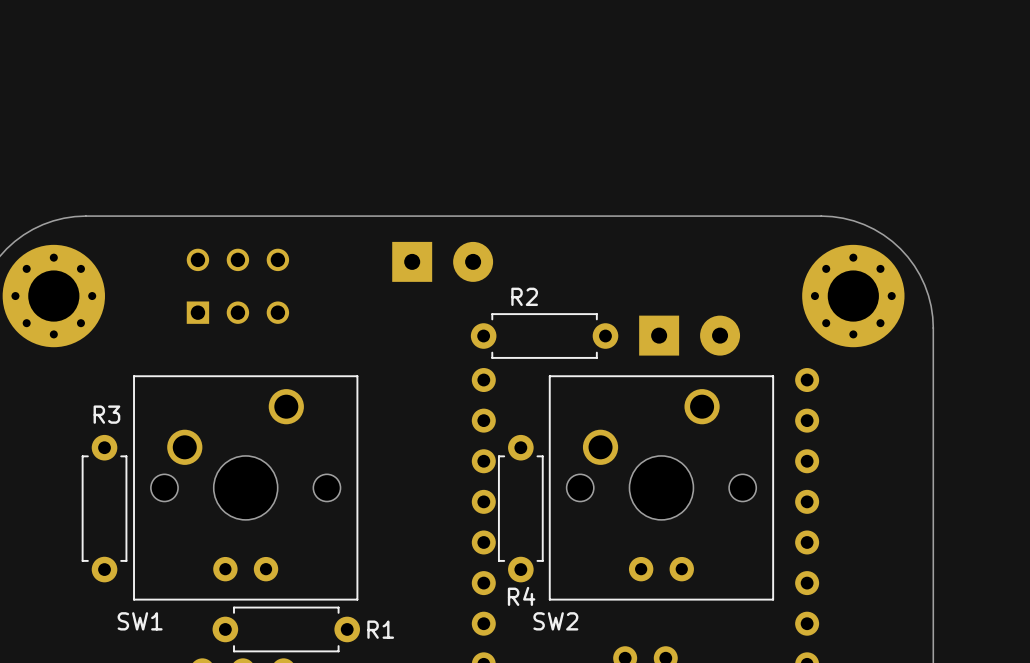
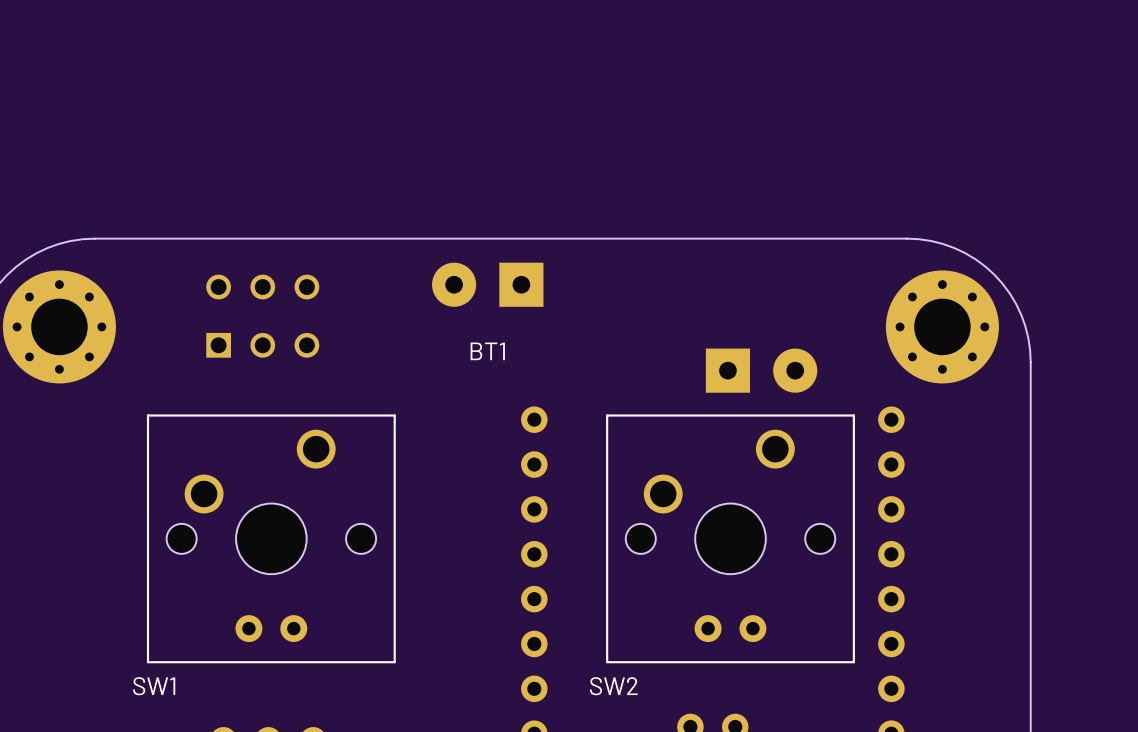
BT1: none -> (487, 284)
part: (442, 261) -> none
R2: (544, 336) -> none
R3: (104, 508) -> none
R4: (520, 508) -> none
R1: (286, 629) -> none

